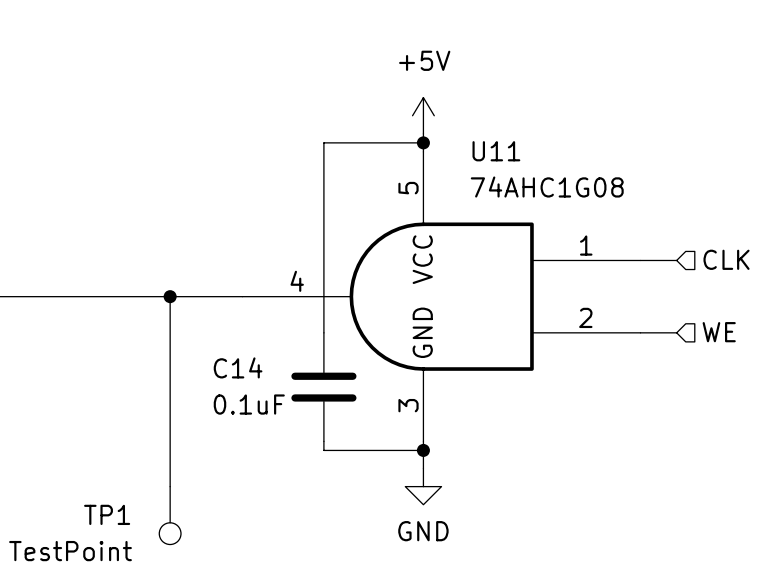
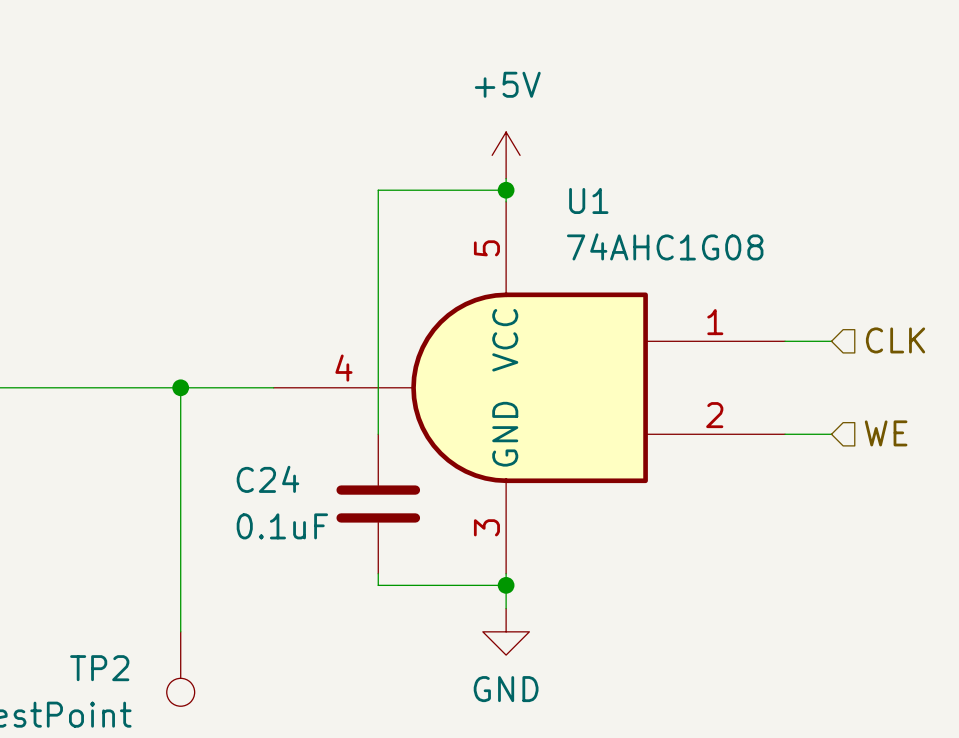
U11 name: U11 (496, 151) -> U1 (588, 200)
C14 name: C14 (238, 367) -> C24 (267, 479)
TP1 name: TP1 (107, 514) -> TP2 (99, 668)

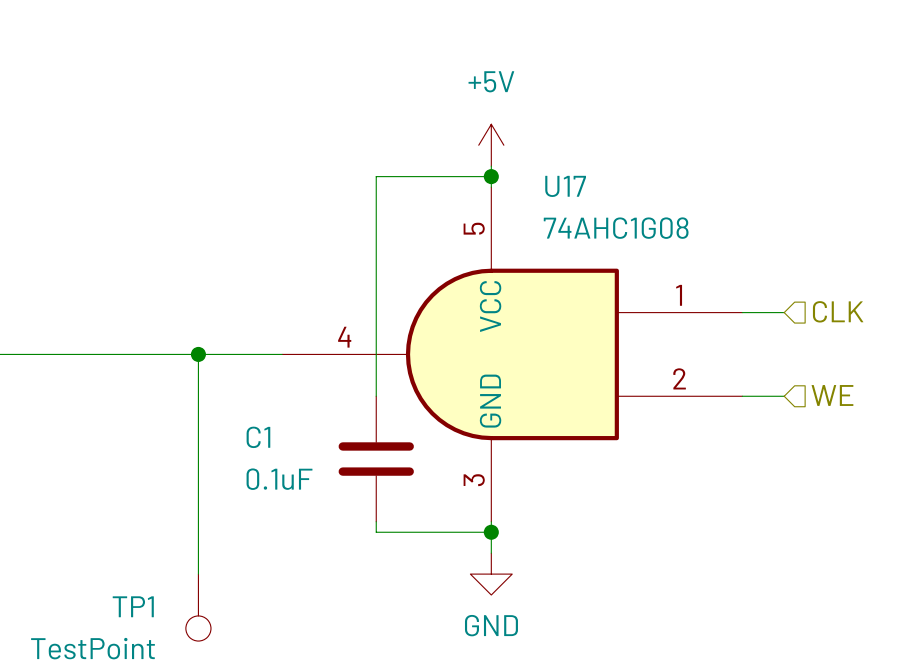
U1 name: U1 (588, 200) -> U17 (565, 186)
C24 name: C24 (267, 479) -> C1 (258, 437)
TP2 name: TP2 (99, 668) -> TP1 (133, 606)

